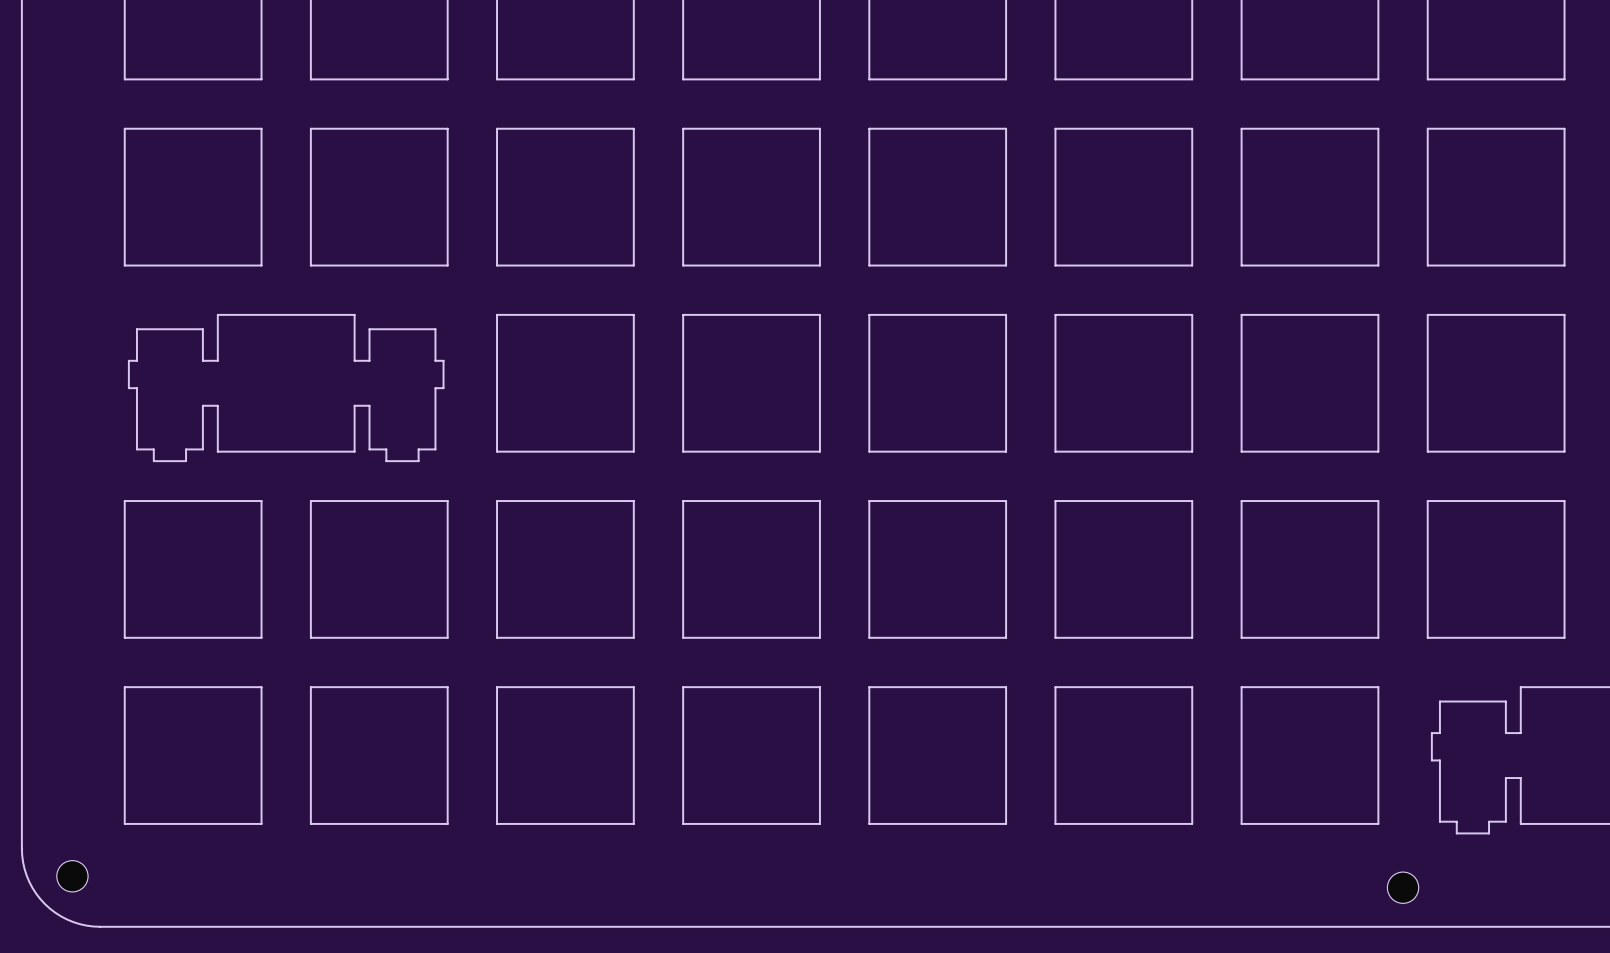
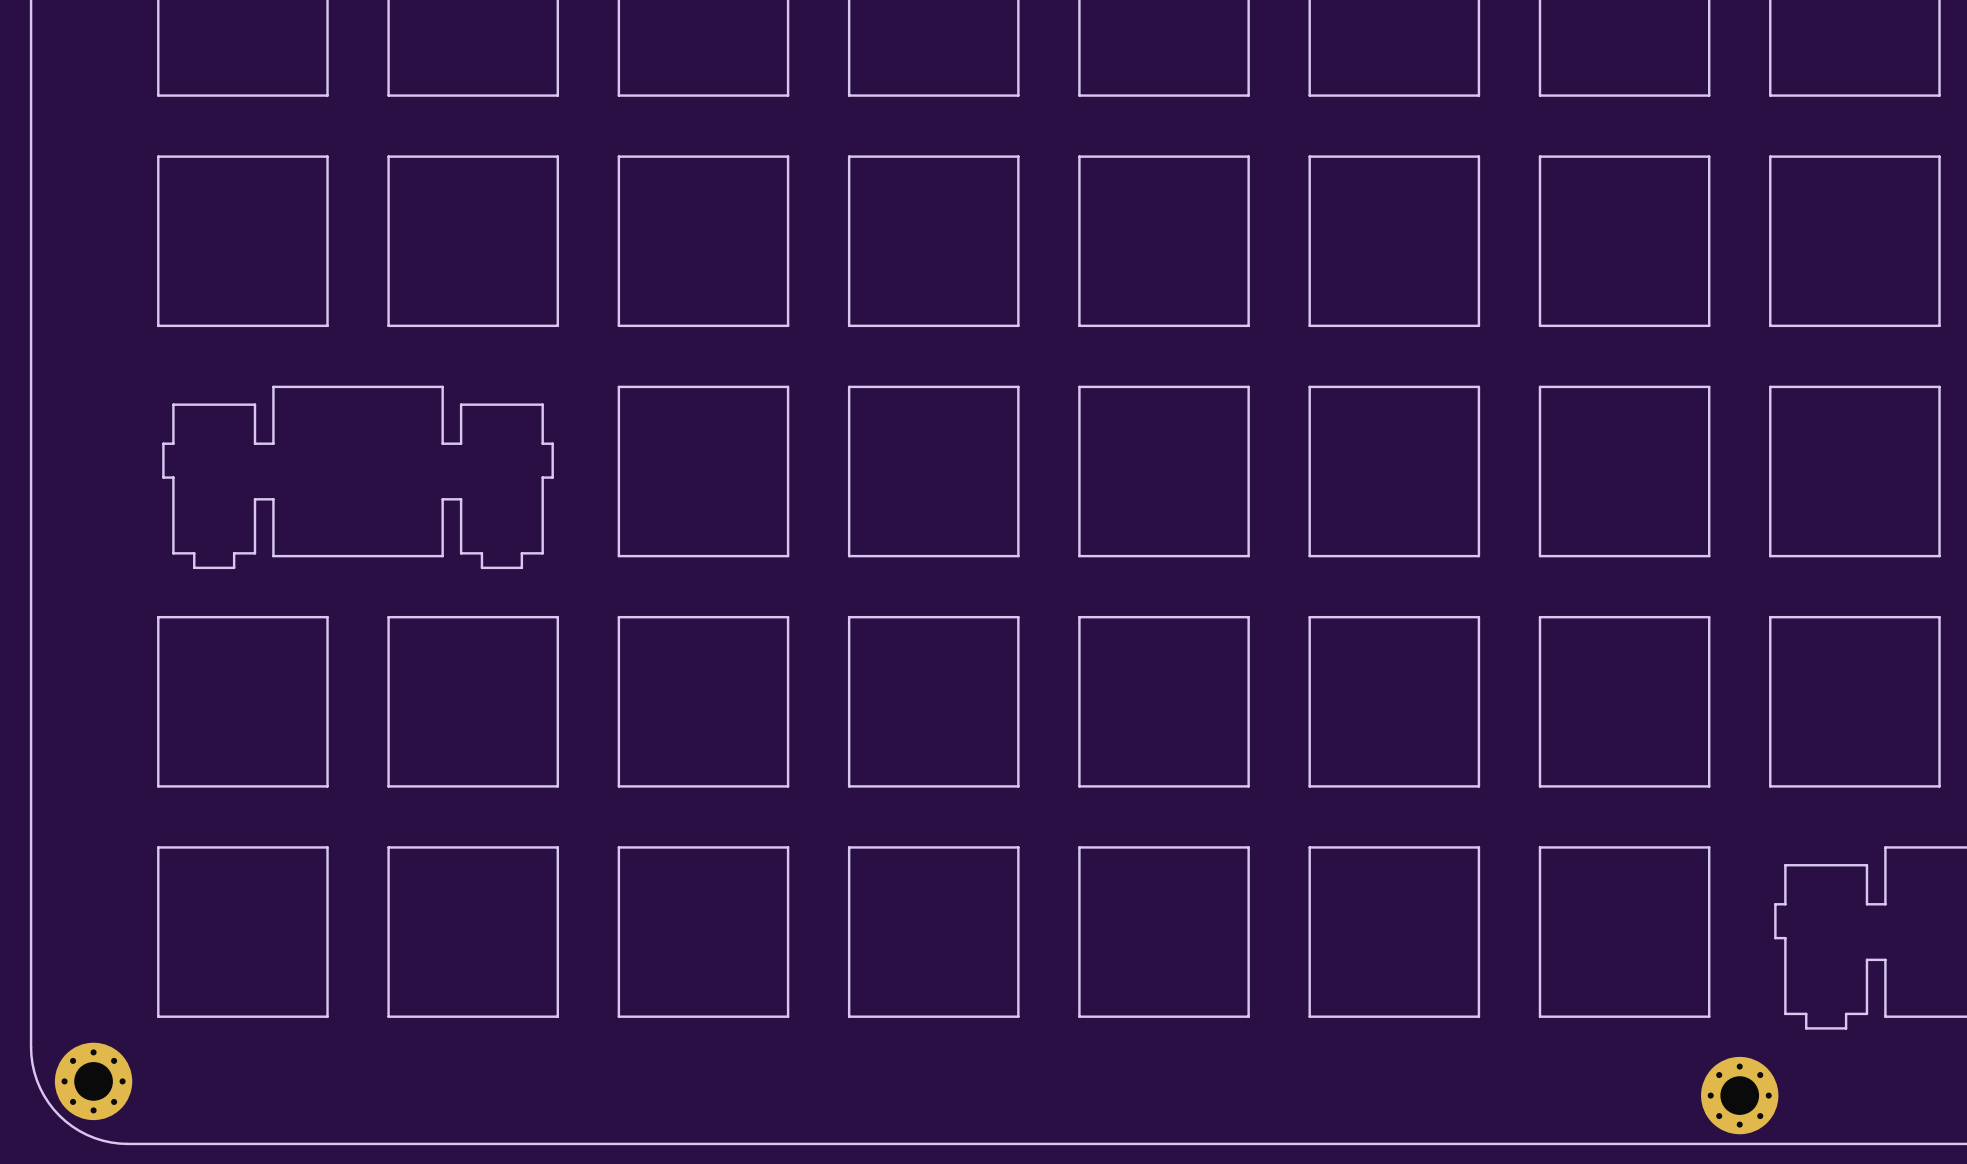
part footprint: [56, 860, 89, 892] -> [54, 1042, 133, 1121]
part footprint: [1387, 872, 1419, 904] -> [1701, 1056, 1779, 1135]

